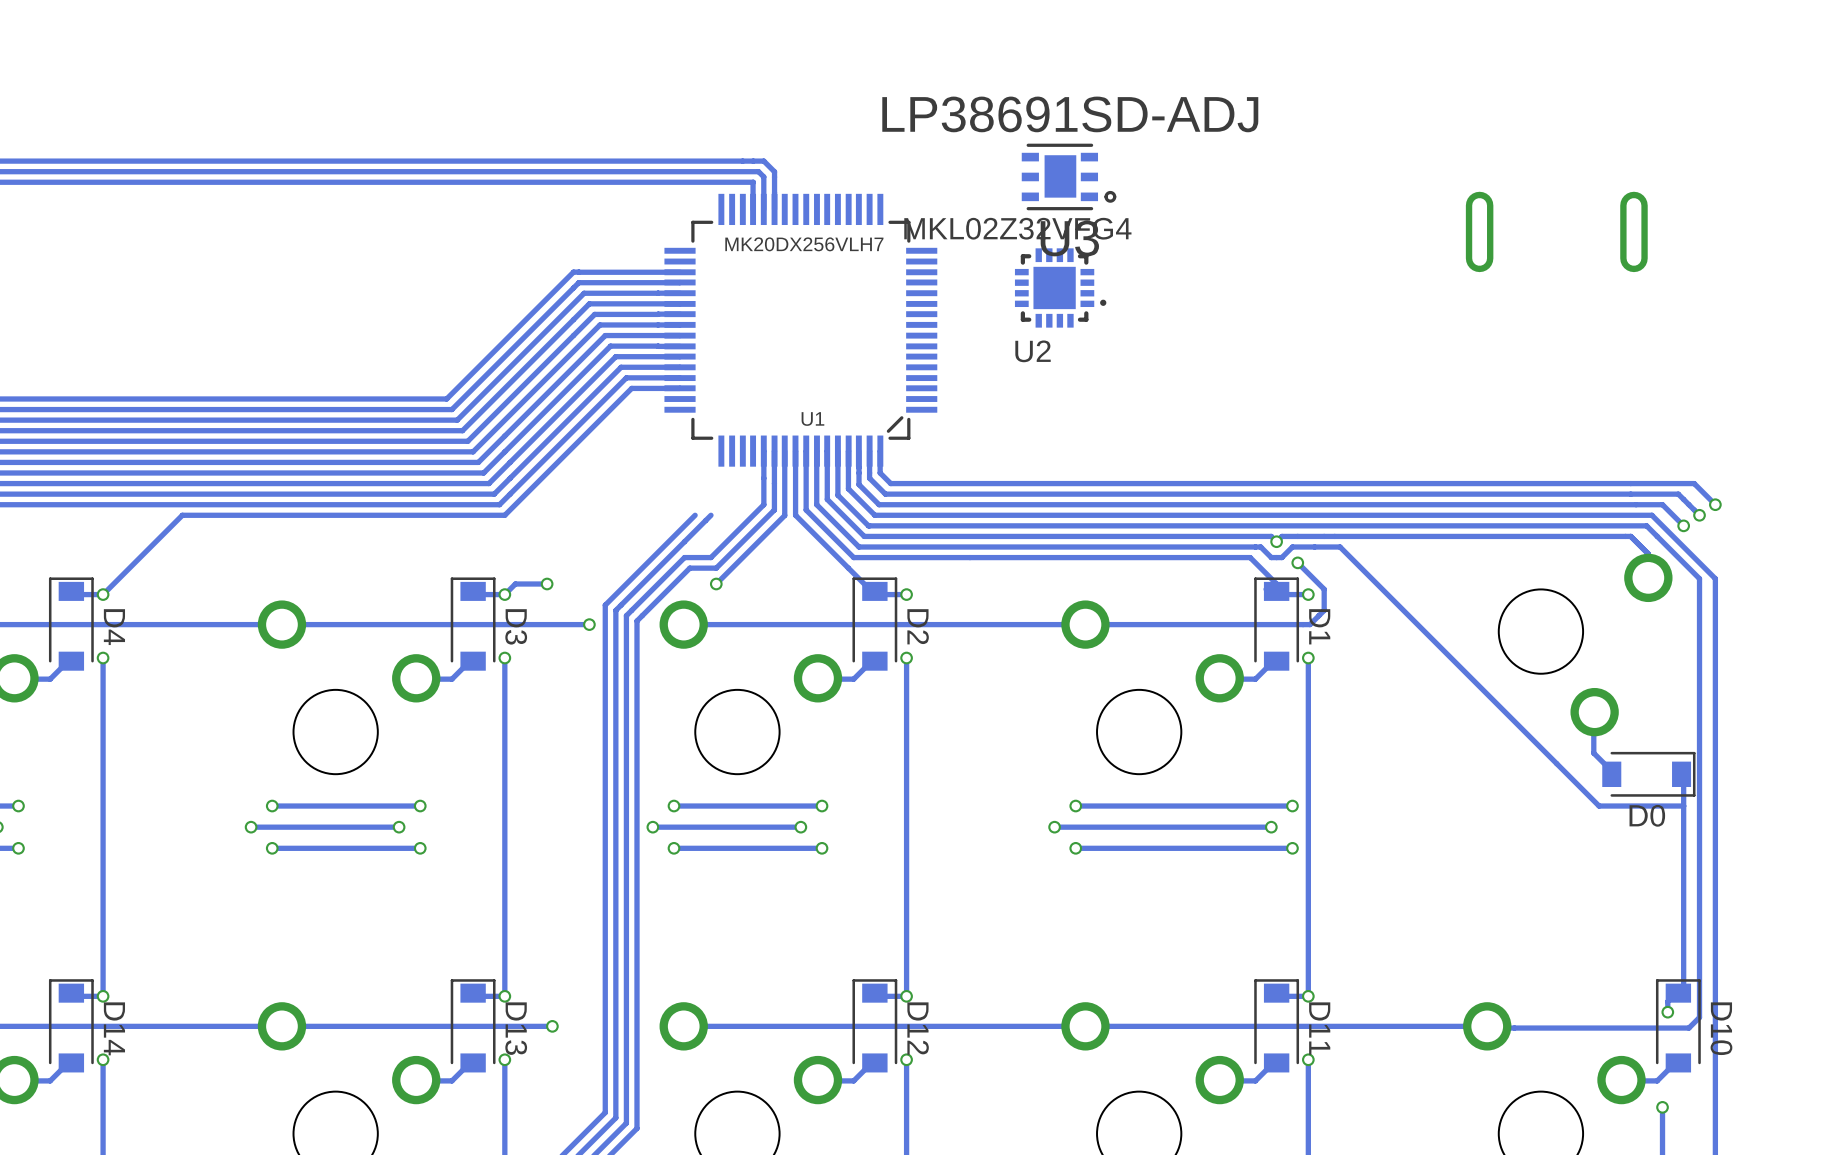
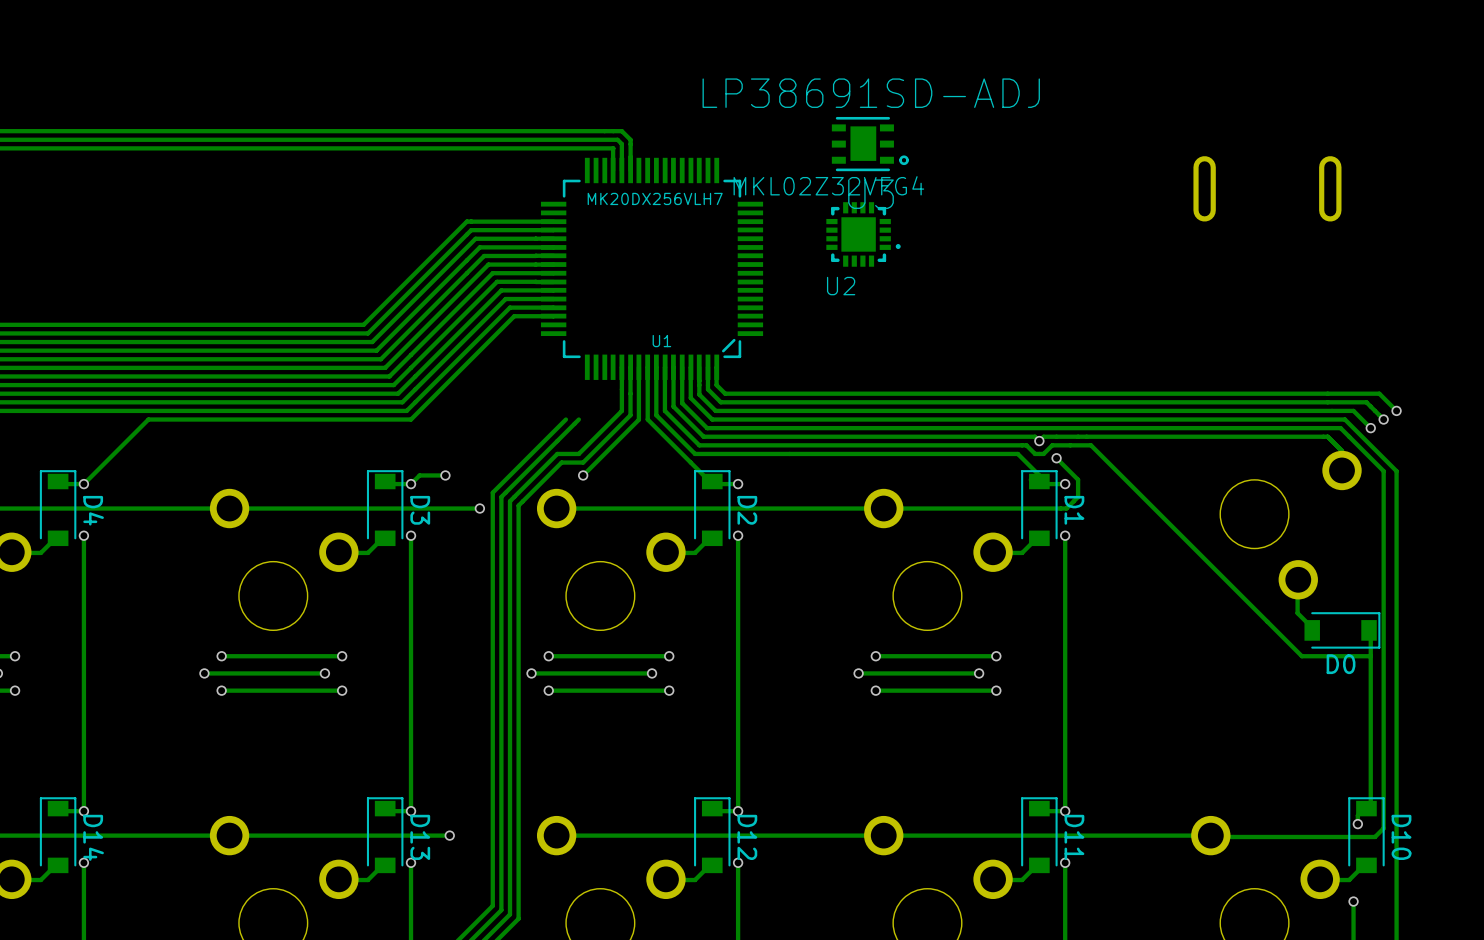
via: none -> (996, 656)
track: (1292, 806) (1223, 806) -> none
via: (1292, 806) -> none
via: none -> (979, 673)
track: (1271, 827) (1202, 827) -> none
via: (1271, 827) -> none
via: none -> (996, 690)
track: (1292, 848) (1223, 848) -> none
via: (1292, 848) -> none

